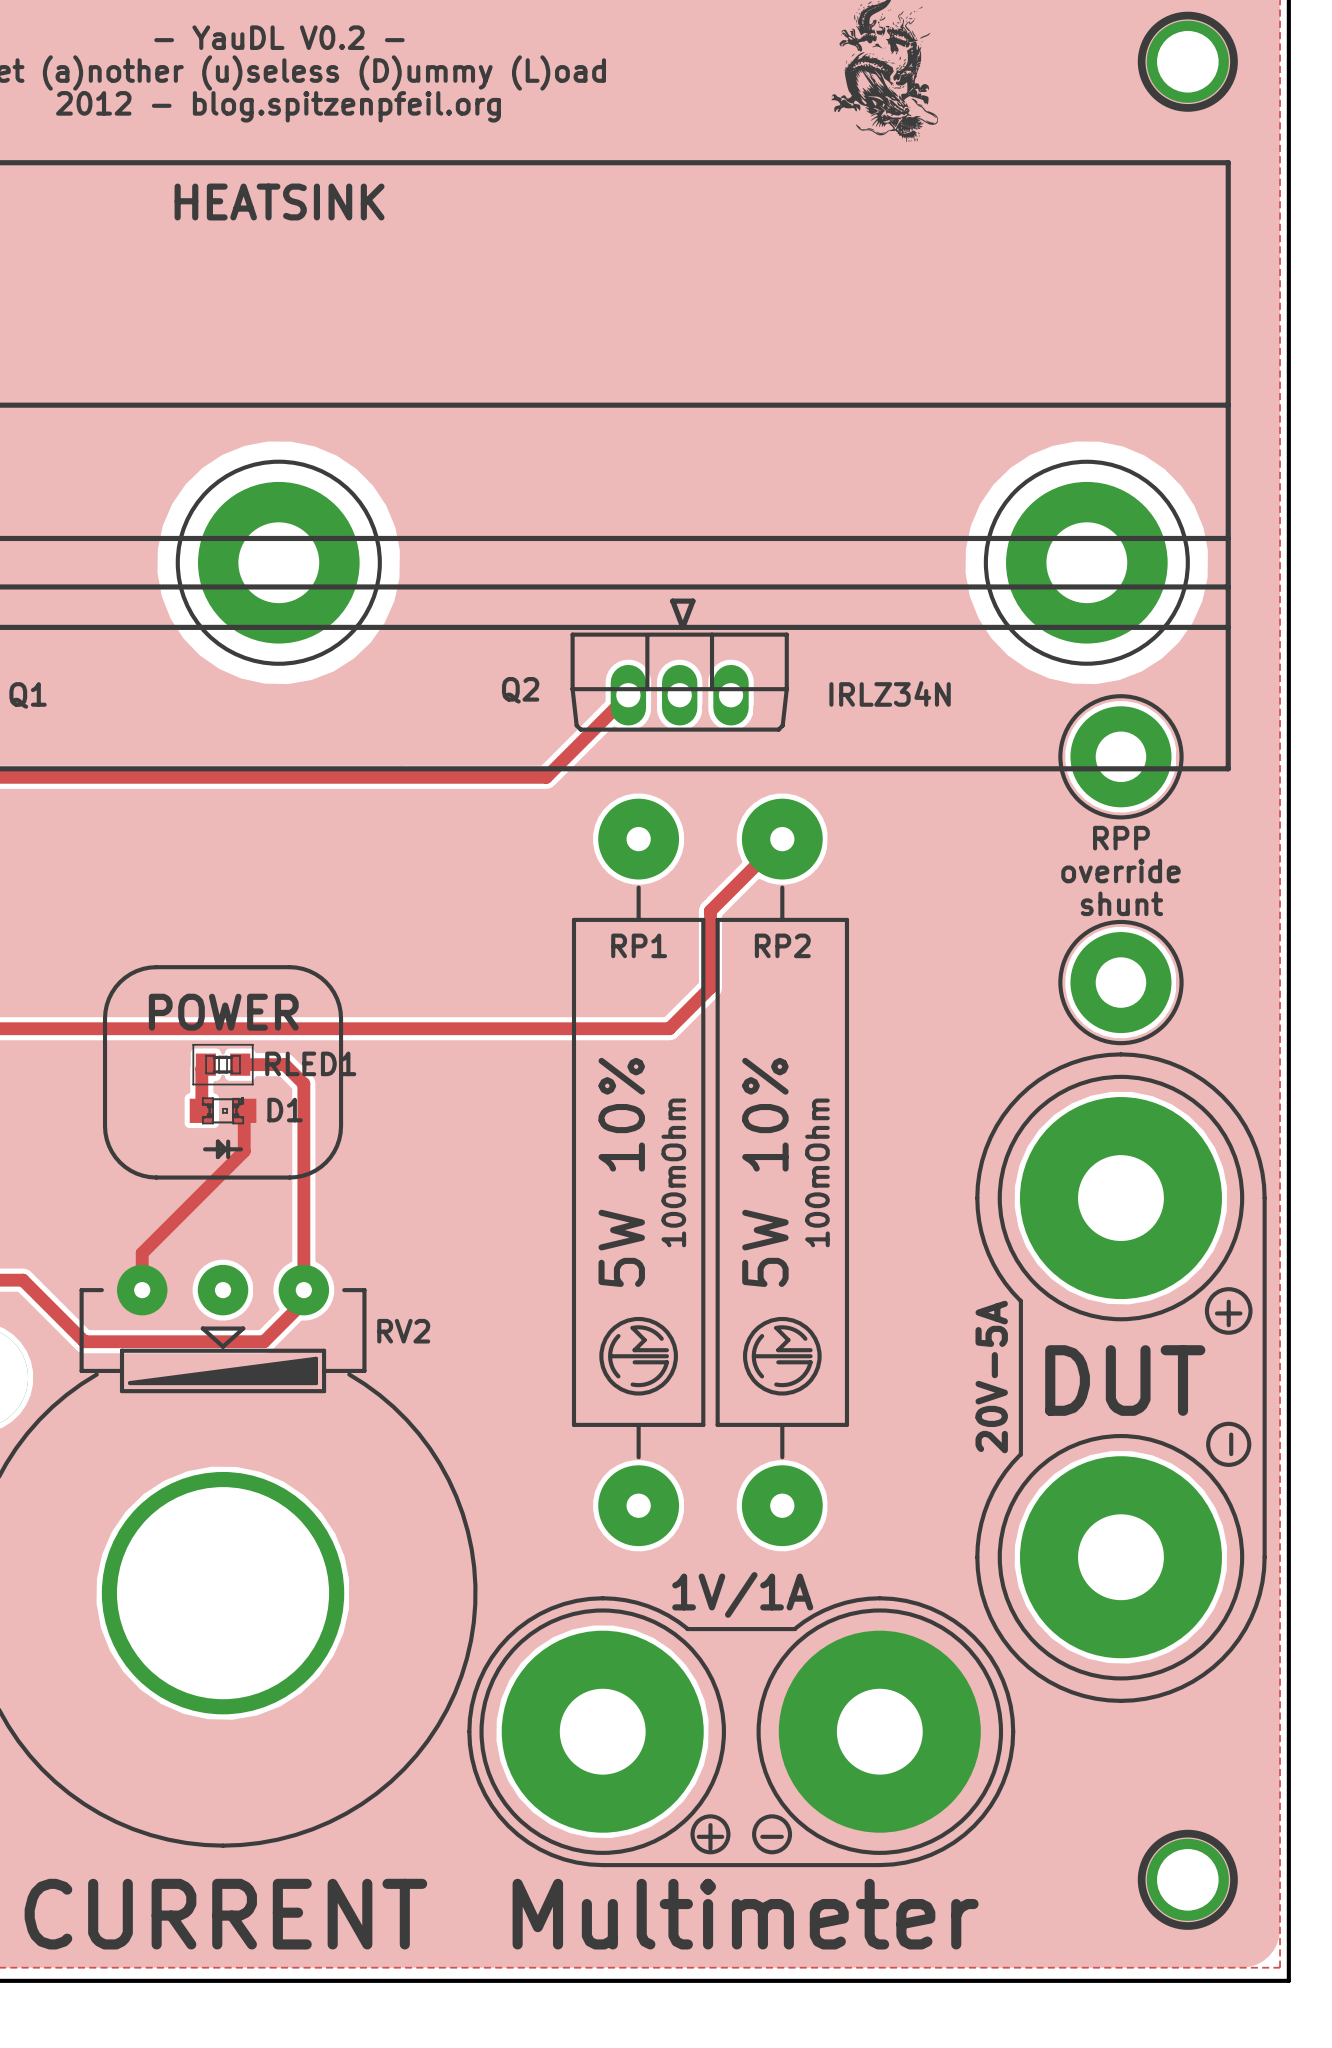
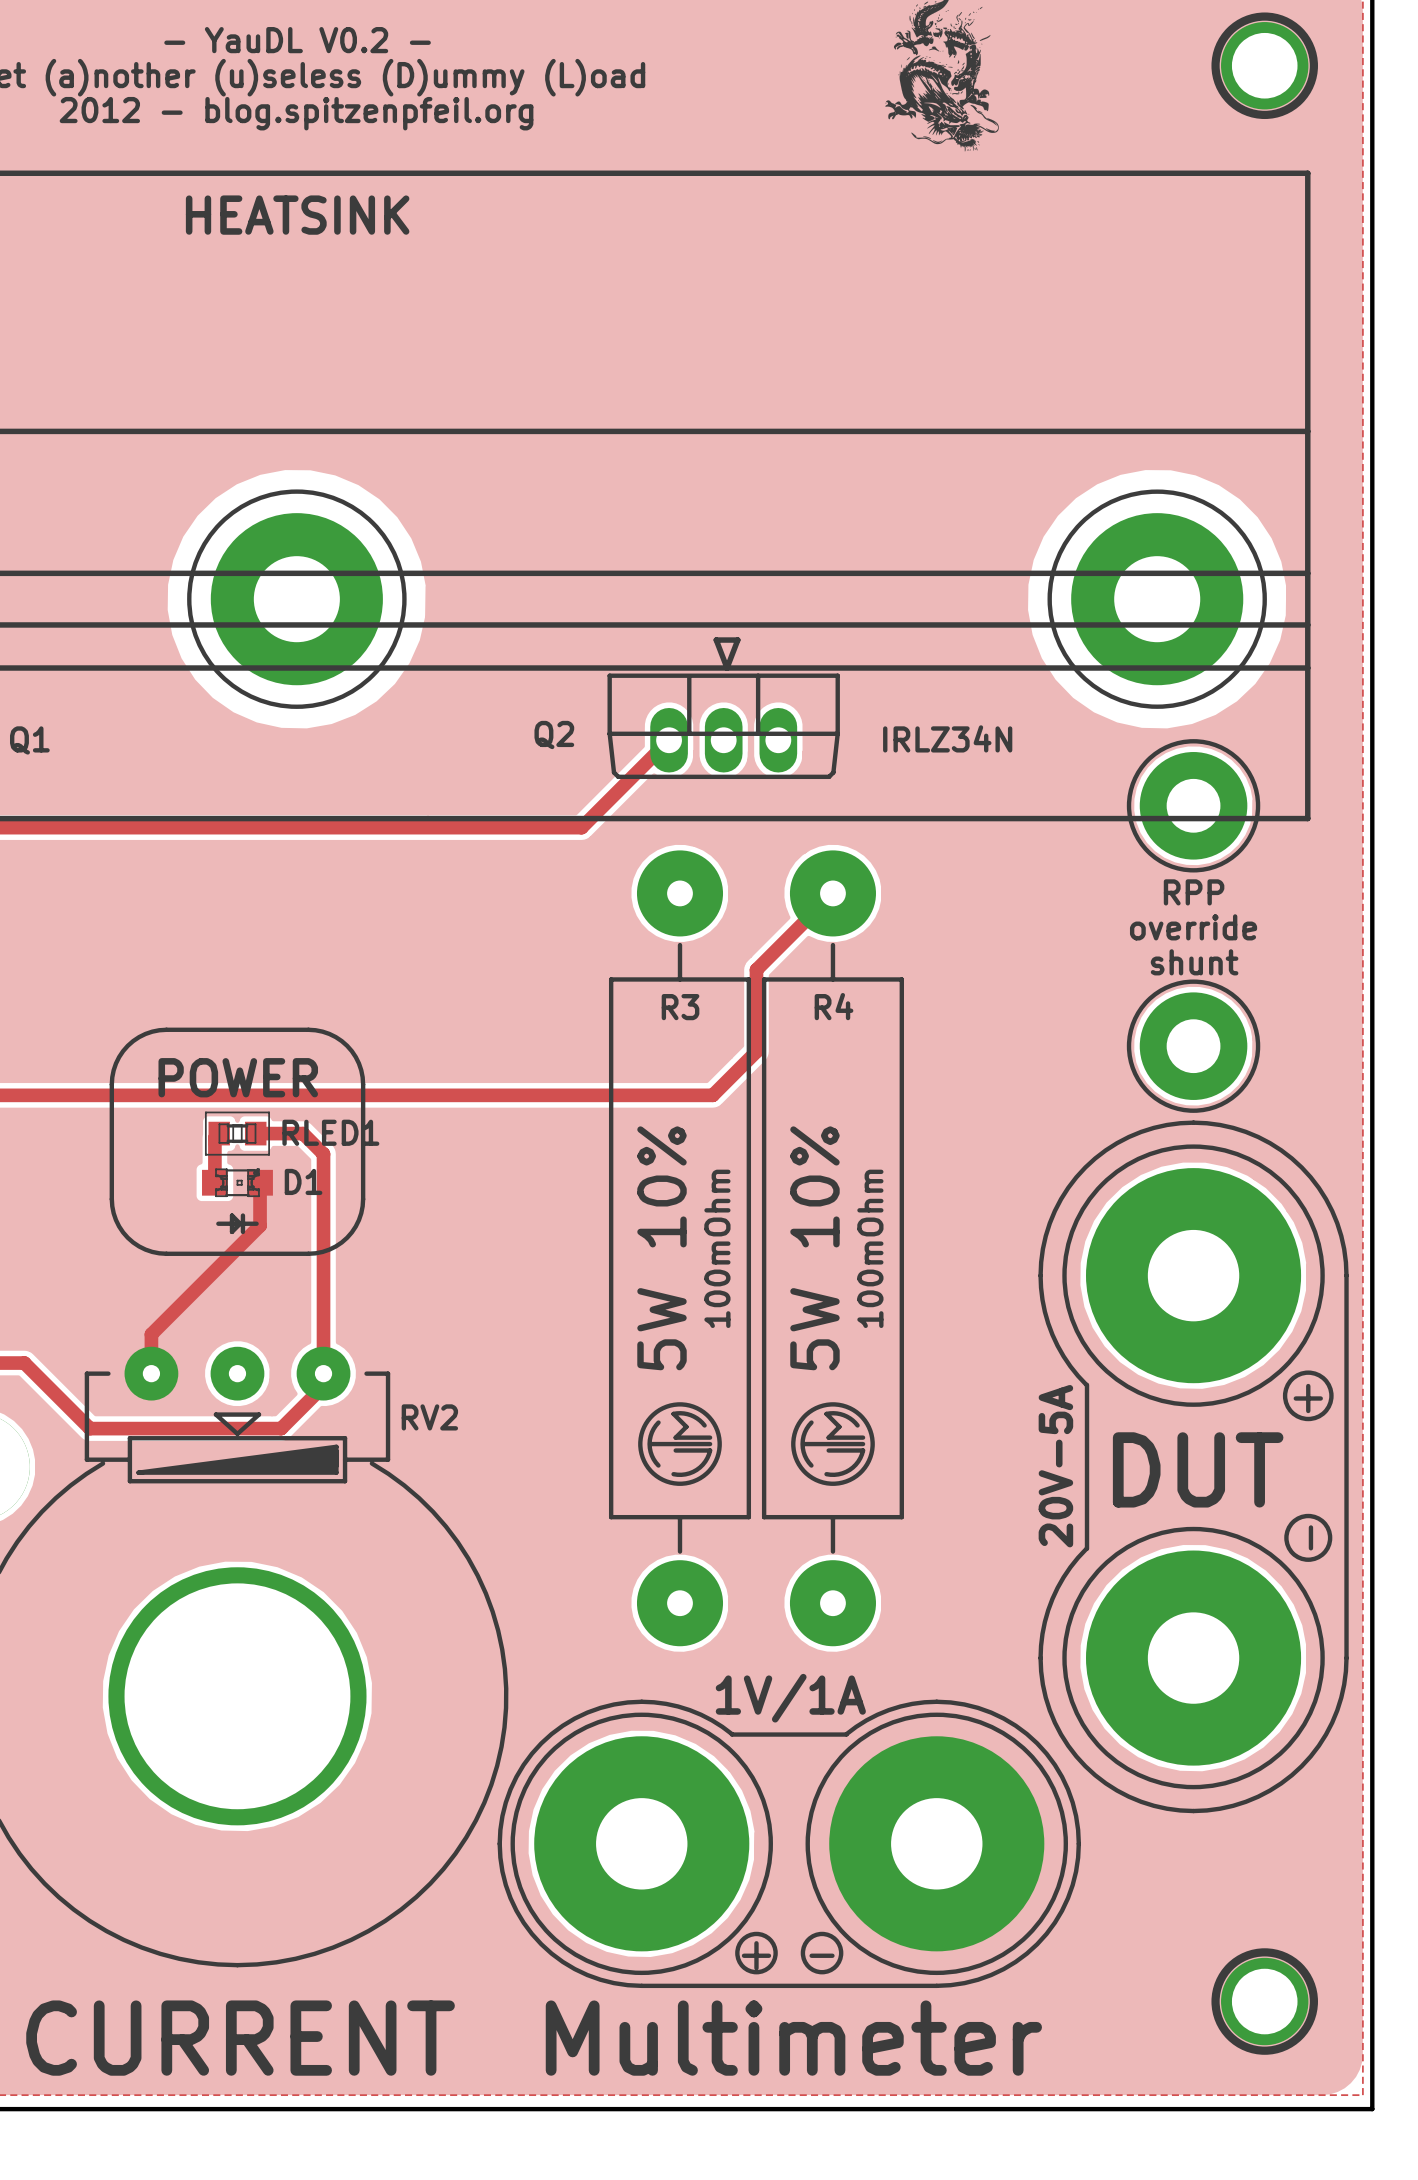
RP1 name: RP1 (639, 945) -> R3 (680, 1007)
RP2 name: RP2 (782, 945) -> R4 (834, 1006)

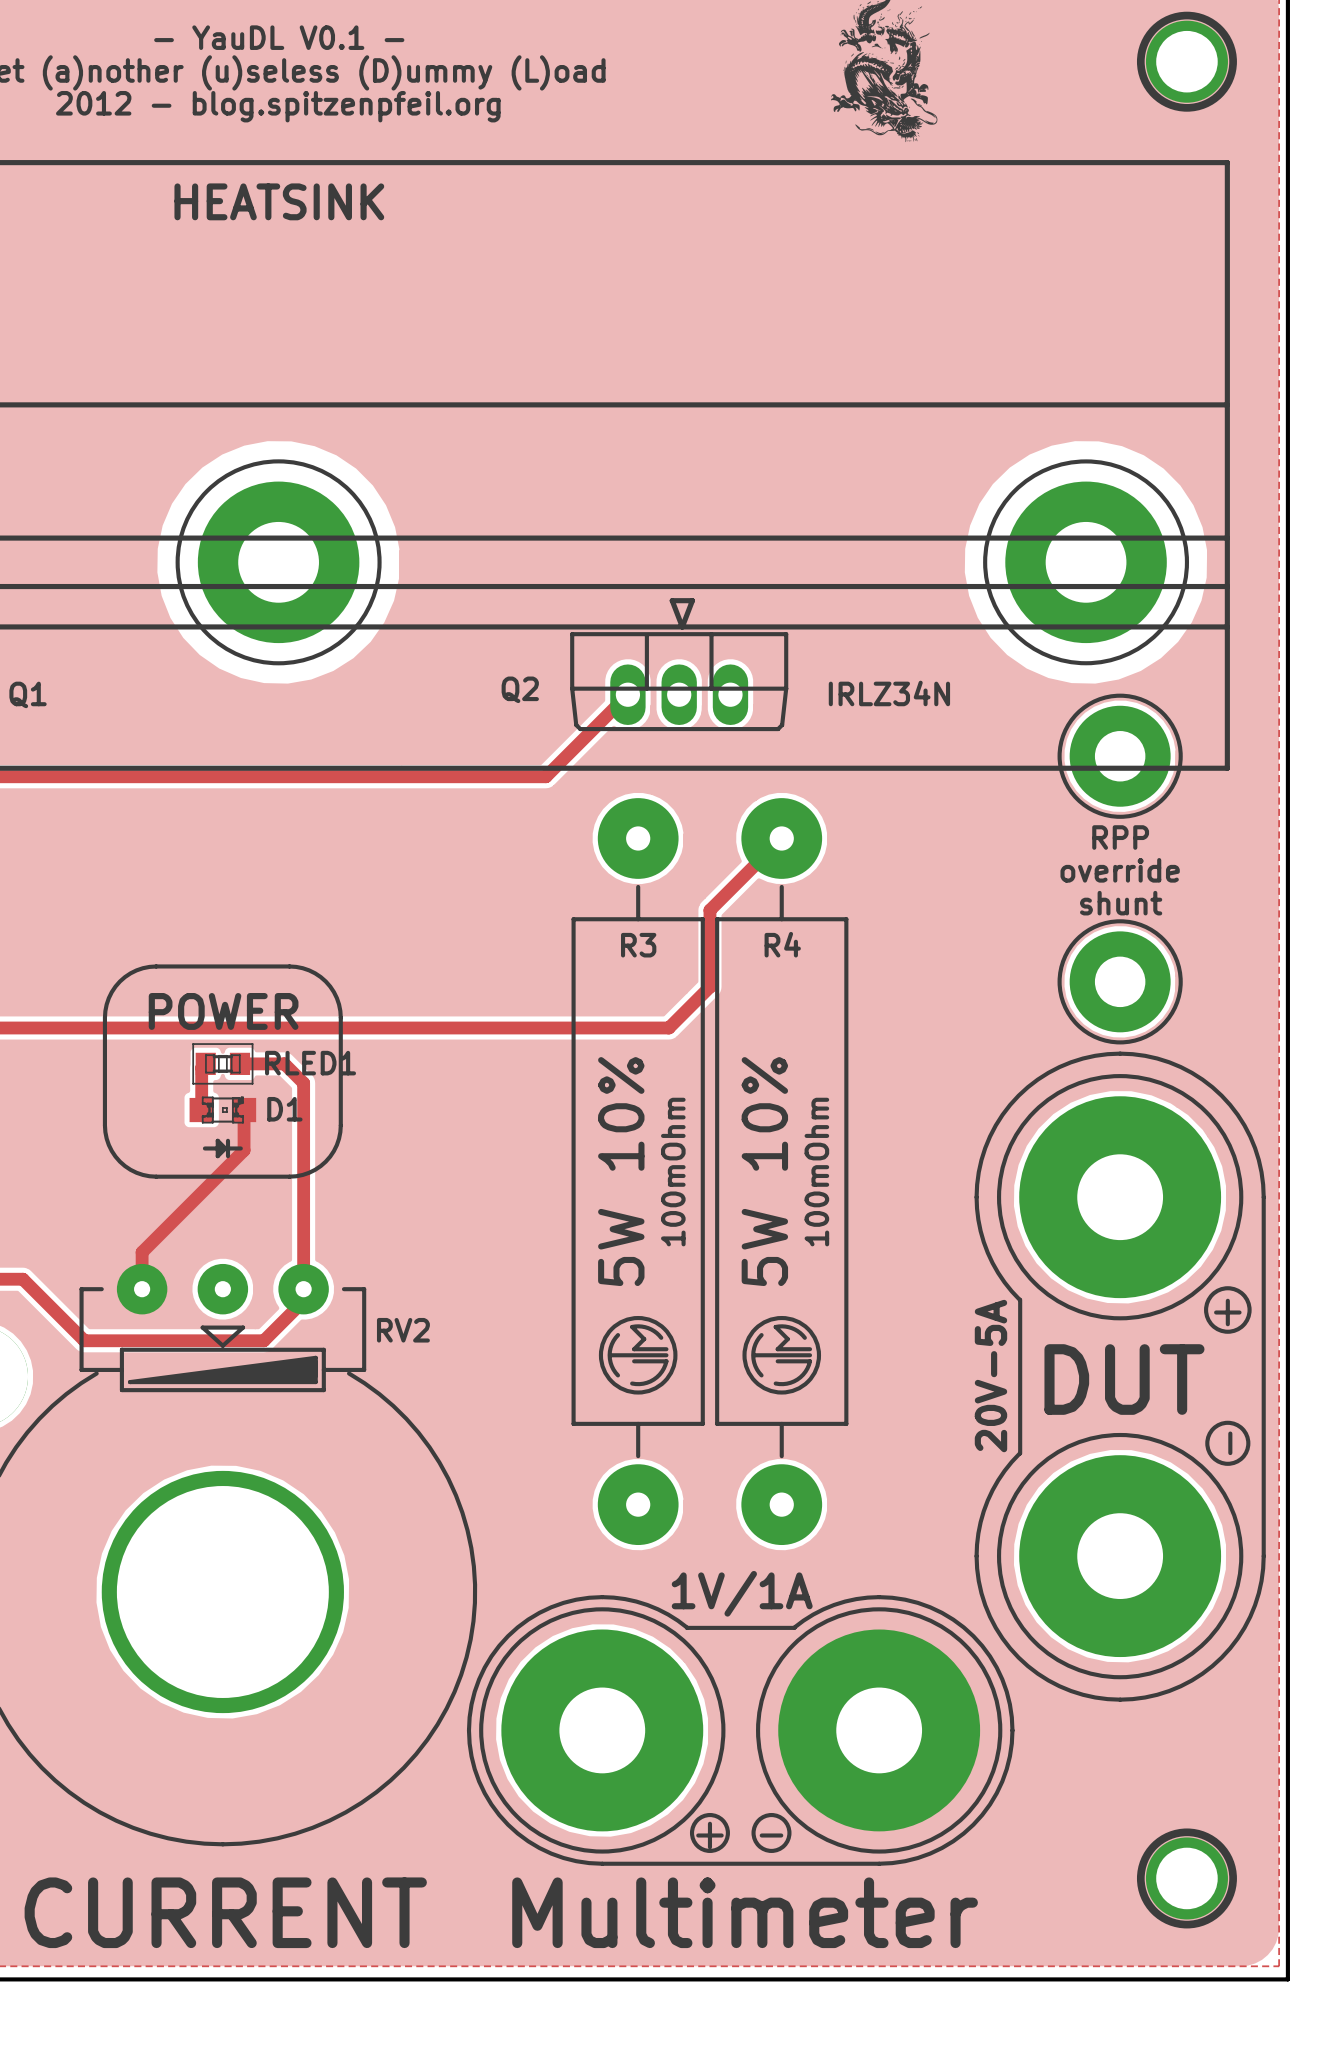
text: - YauDL V0.2 - (297, 40) -> - YauDL V0.1 - (279, 37)

